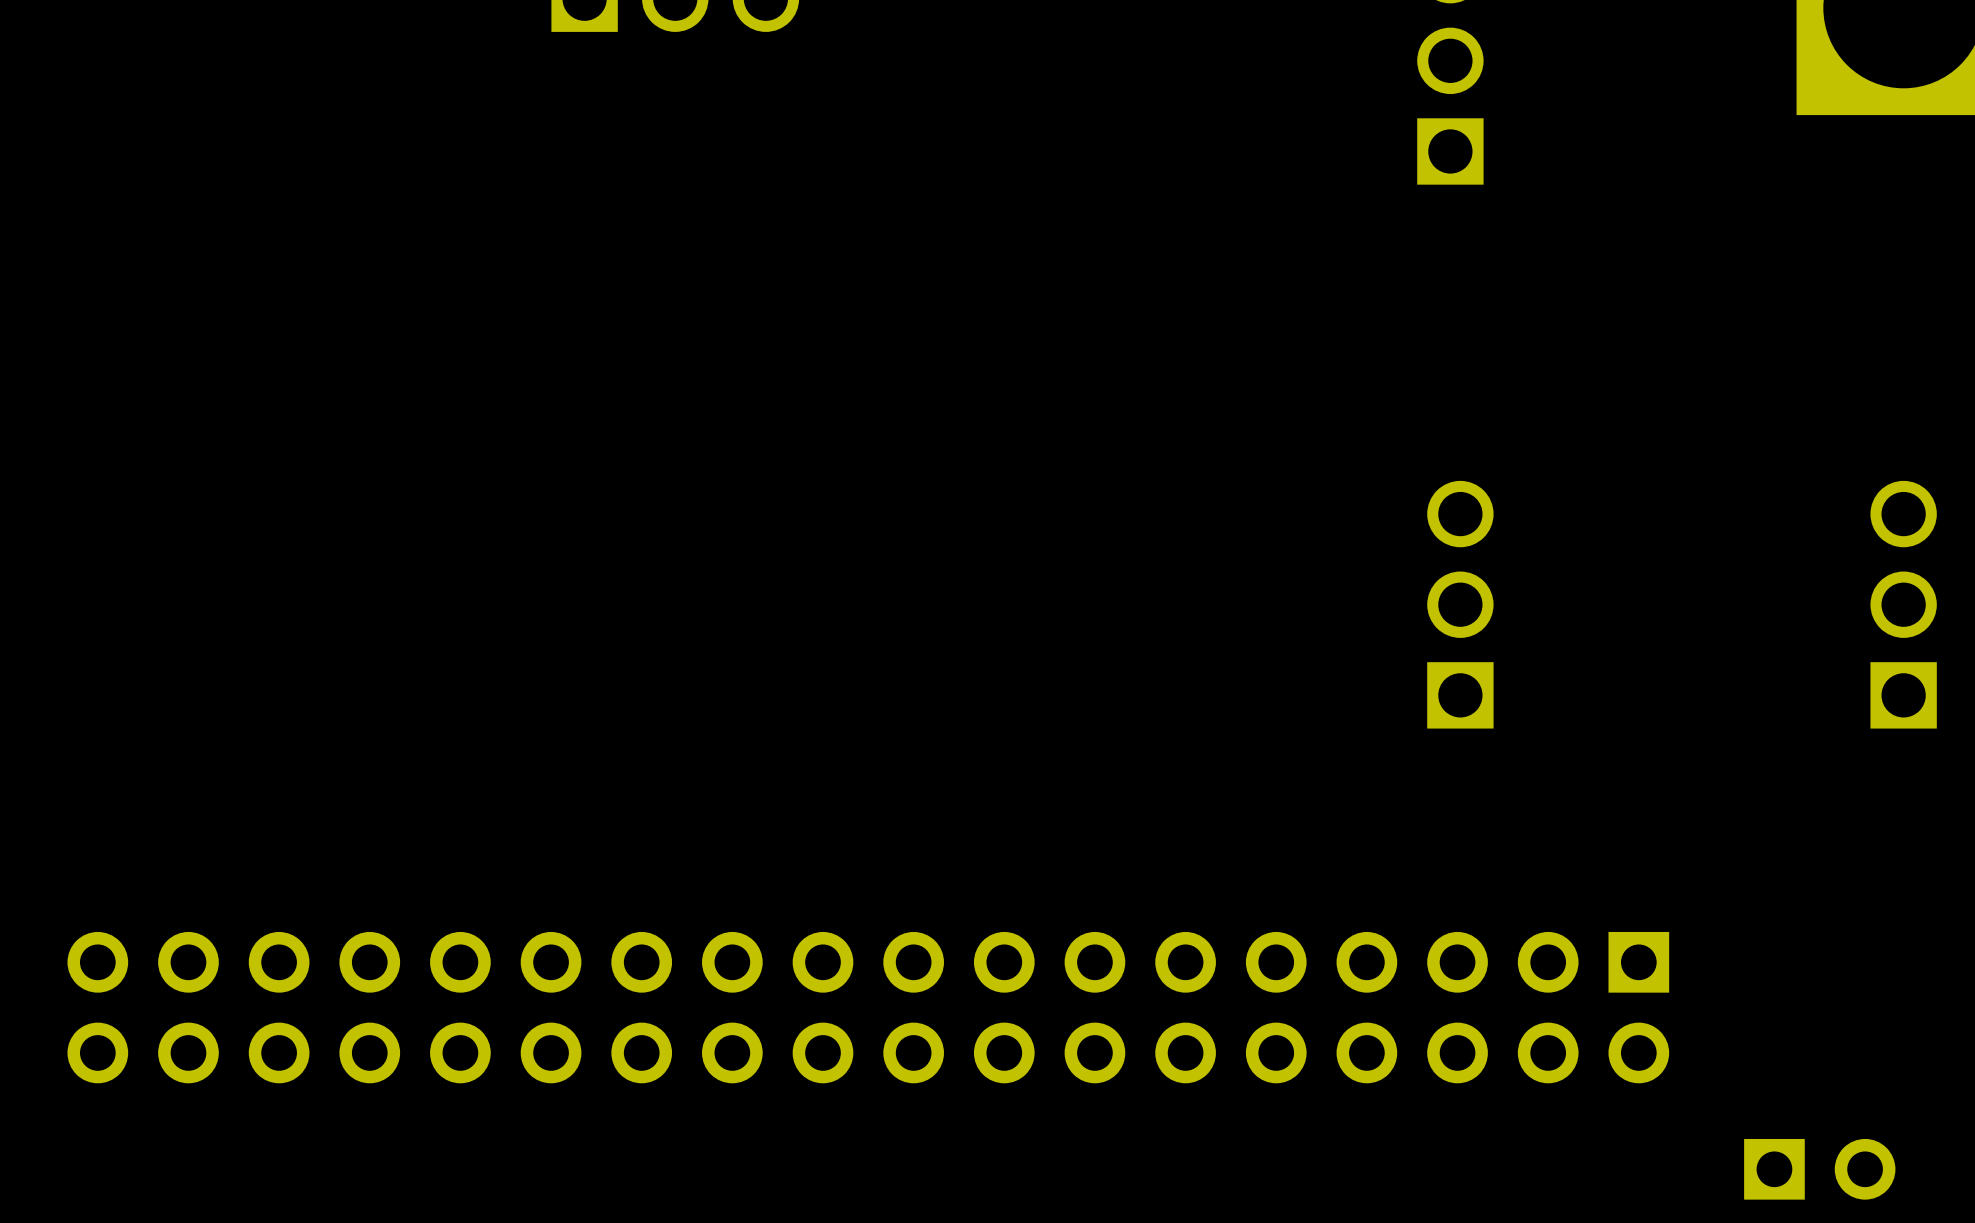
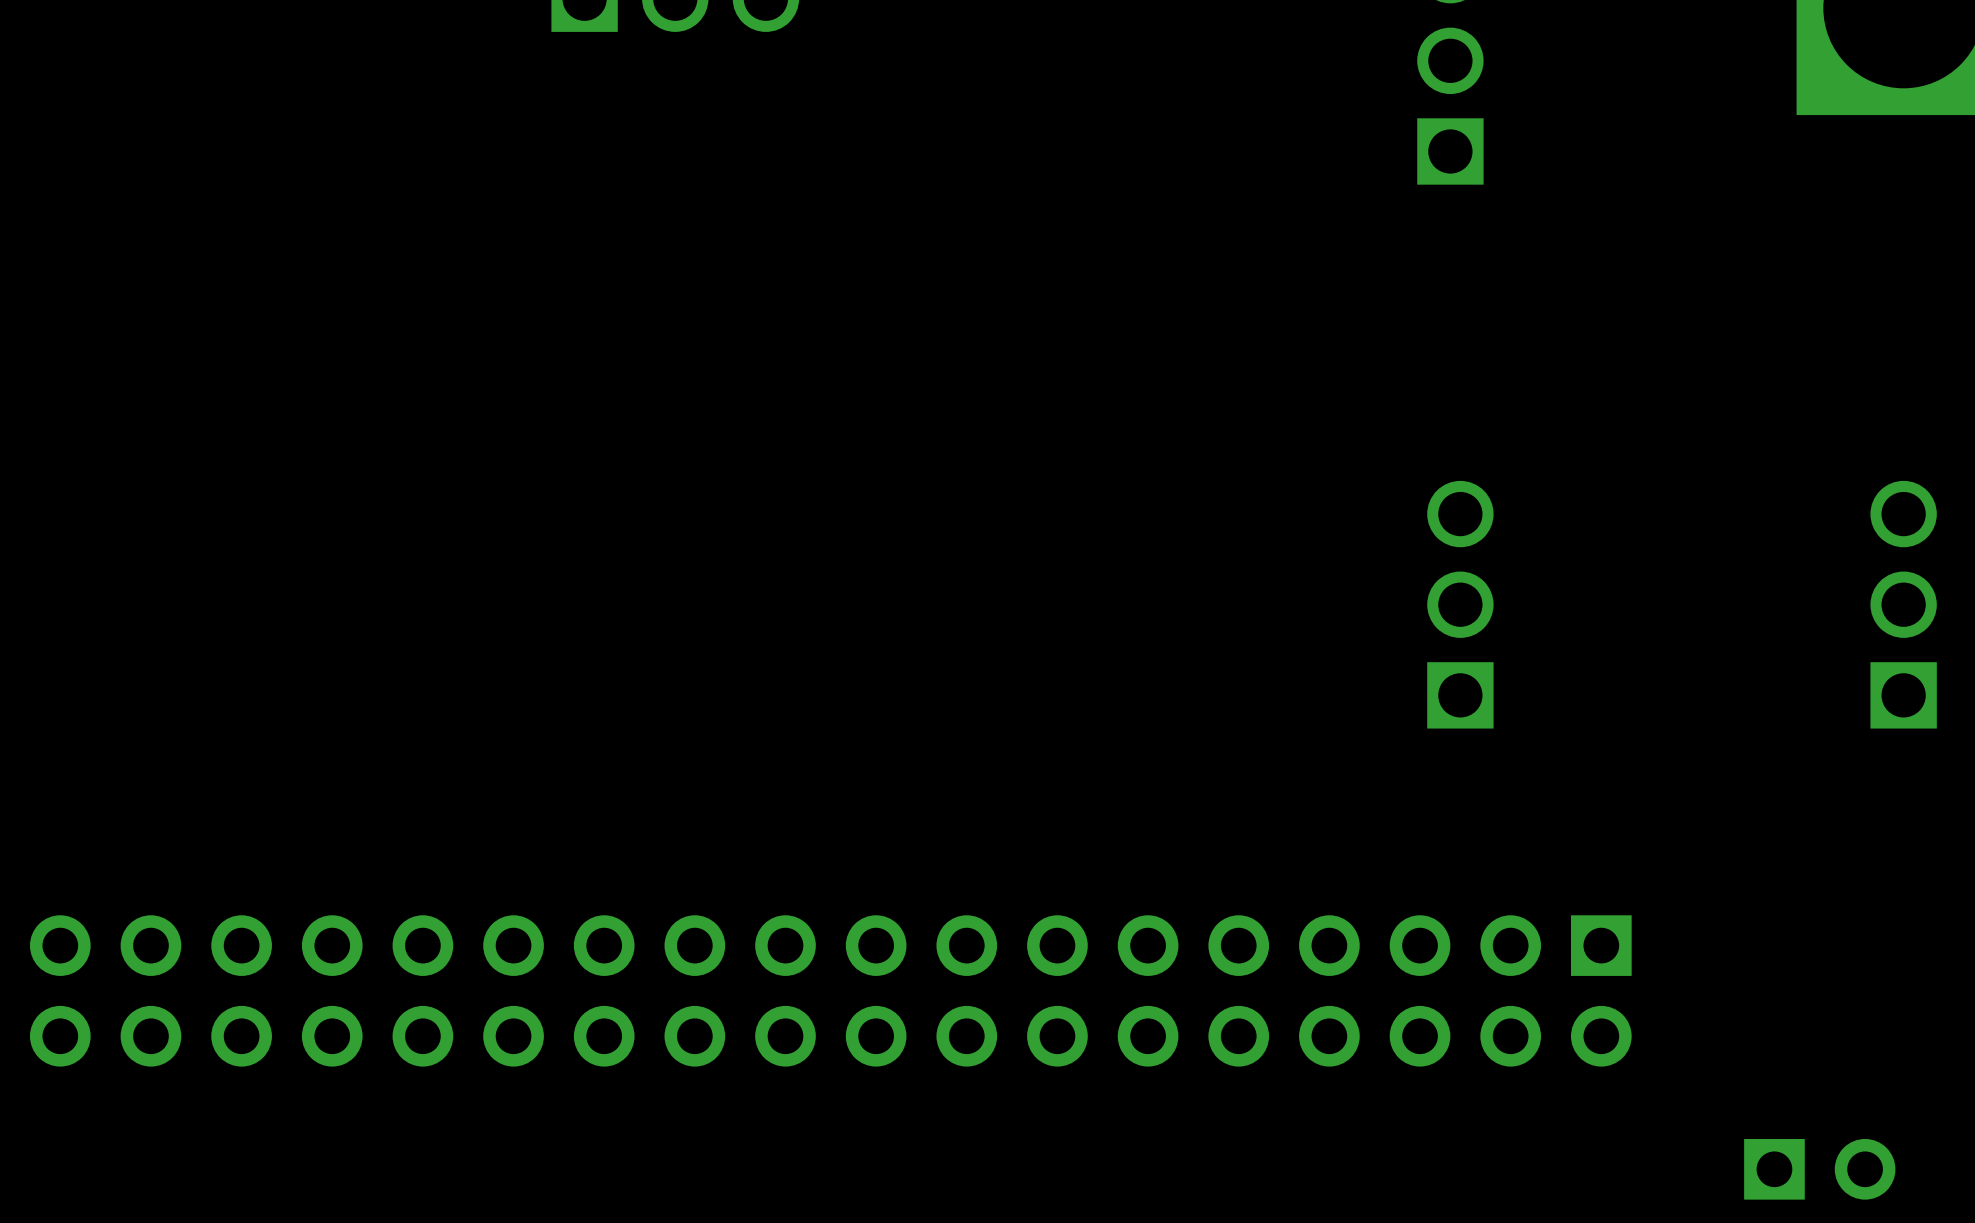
part position: (868, 1007) -> (830, 990)

